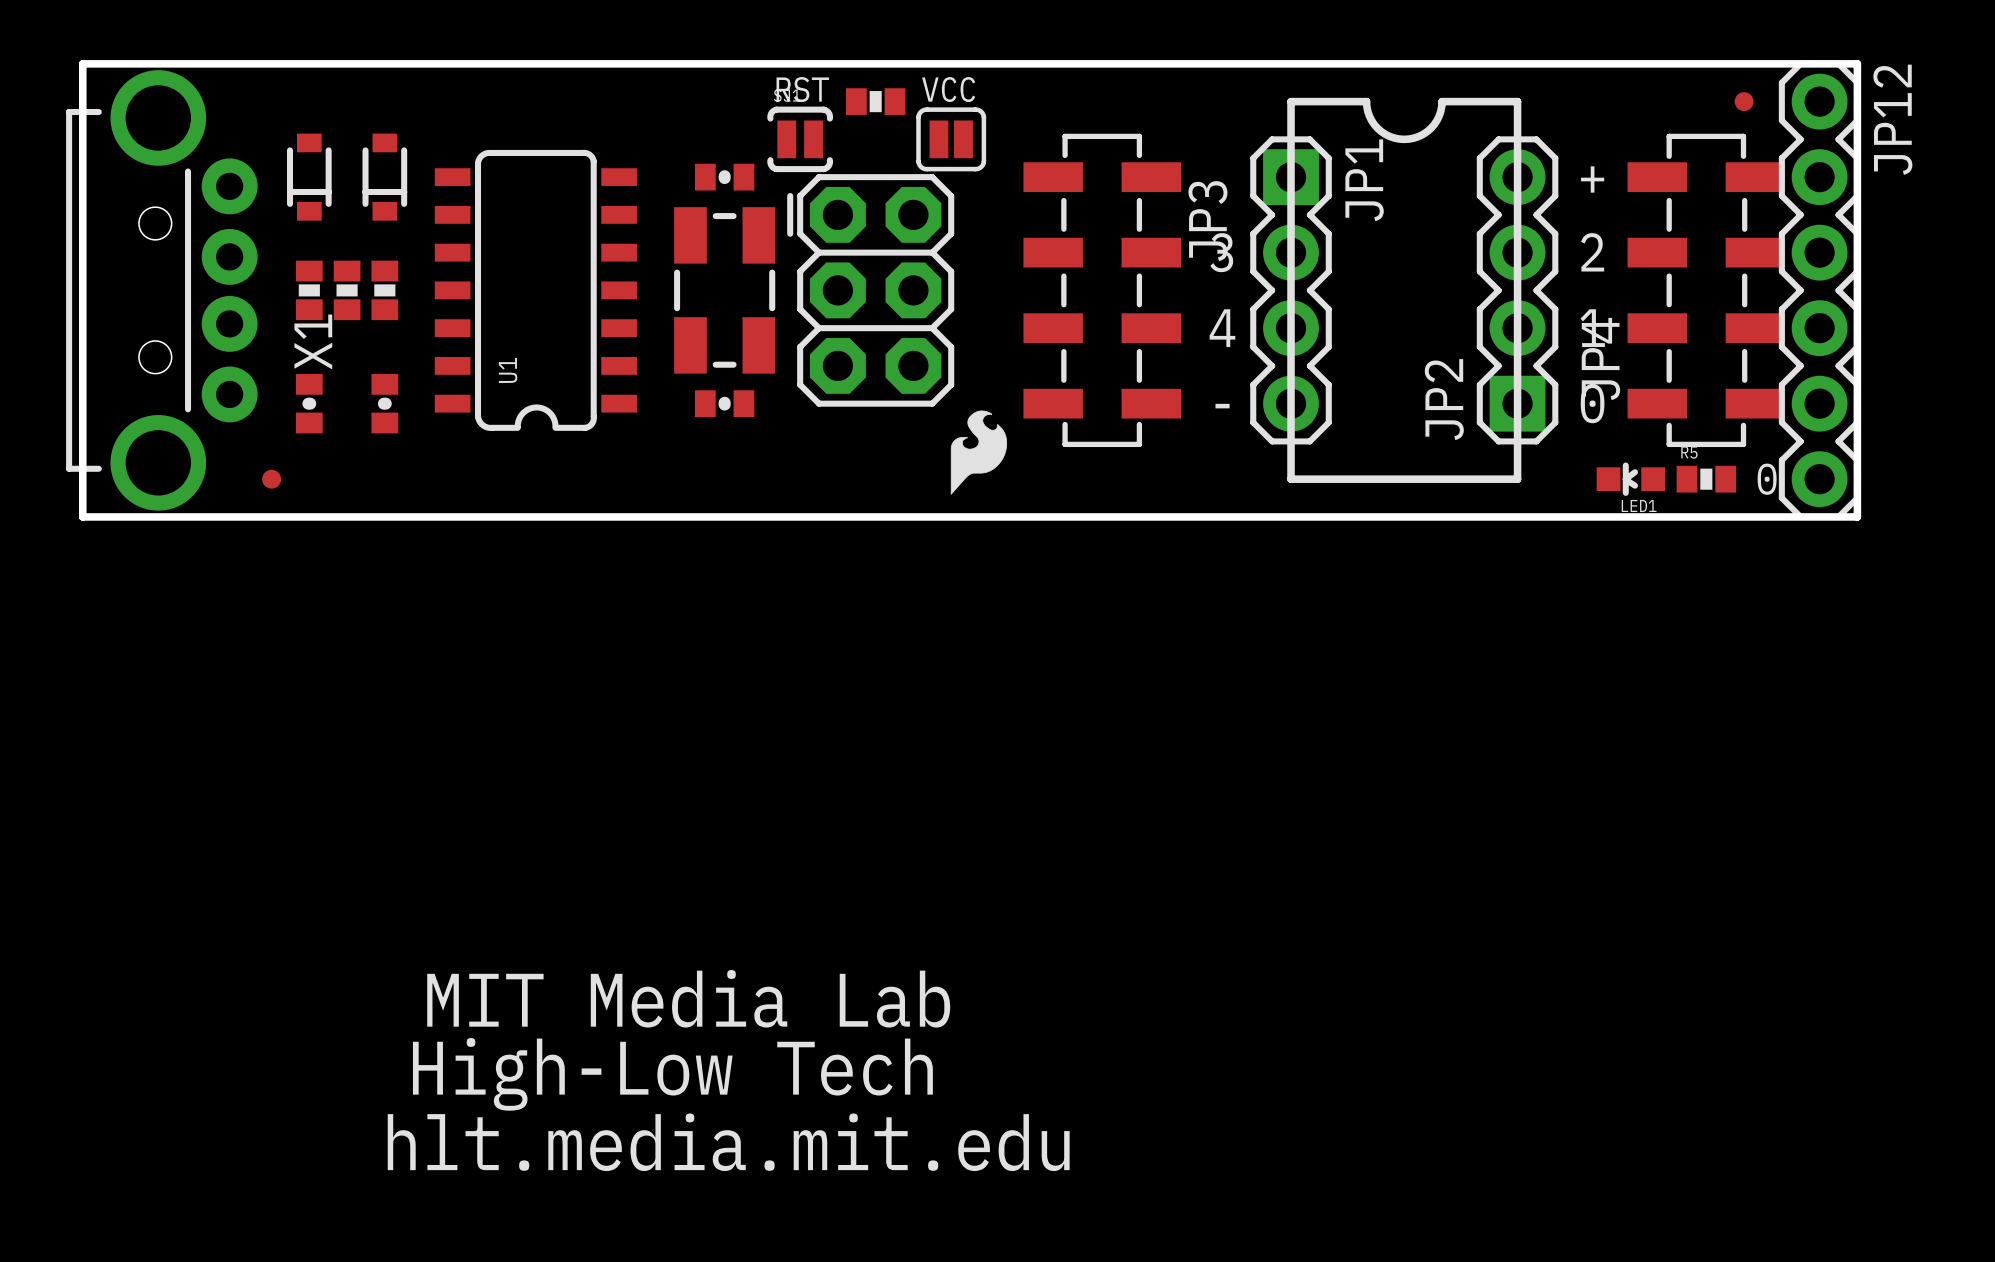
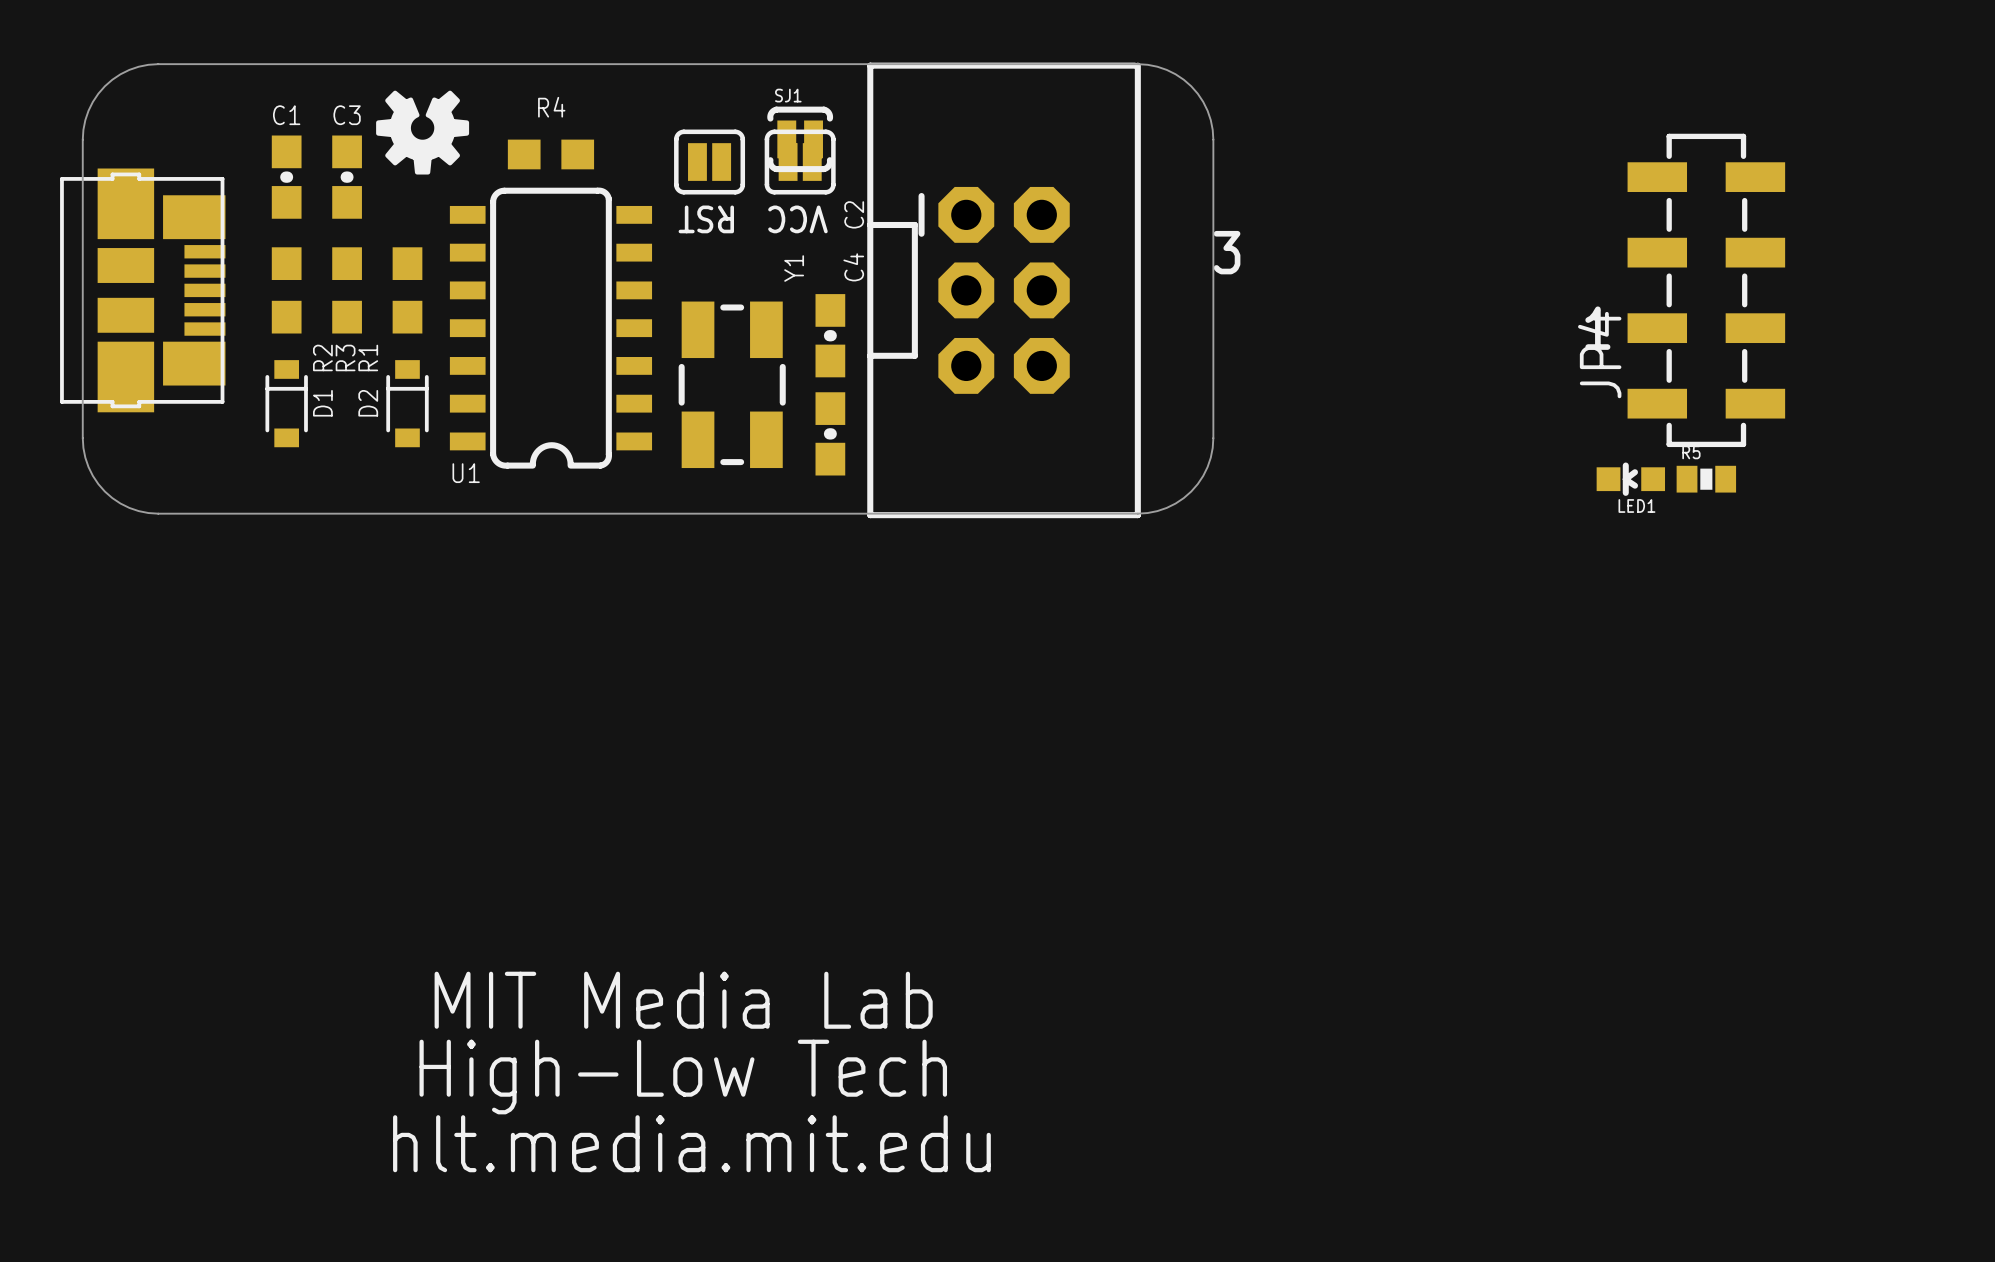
text rotation: 0° (802, 89) -> 180° (706, 219)
text position: RST (802, 89) -> RST (706, 219)
text rotation: 0° (948, 89) -> 180° (797, 219)
text position: VCC (948, 89) -> VCC (797, 219)
drawing: none -> [376, 90, 470, 175]
part: (875, 101) -> none
line: (1291, 101) (1366, 101) (1369, 116) (1377, 128) (1389, 136) (1404, 139) (1418, 136) (1430, 128) (1439, 116) (1442, 101) (1517, 101) (1517, 479) (1291, 479) (1291, 101) -> none
part: (1744, 101) -> none
board edge: (82, 139) (82, 63) (1857, 63) (1857, 516) (82, 516) (82, 438) -> (82, 139) (88, 110) (104, 86) (129, 69) (158, 64) (1147, 64) (1166, 69) (1191, 86) (1207, 110) (1213, 139) (1212, 448) (1207, 467) (1191, 491) (1175, 503) (1157, 511) (1137, 513) (148, 513) (129, 507) (104, 491) (88, 467) (82, 438)
board edge width: thick (82, 139) (82, 438) -> thin (82, 139) (82, 438)
part: (951, 139) -> none
R4: none -> (550, 154)
part: none -> (800, 162)
part footprint: [694, 163, 755, 191] -> [674, 129, 746, 195]
C1: none -> (286, 177)
part: (309, 177) -> none
C3: none -> (347, 177)
part: (384, 177) -> none
text: + (1592, 179) -> none
text: 2 (1592, 252) -> none
part: none -> (142, 290)
X1: (161, 290) -> none
R2: none -> (286, 290)
part: (309, 290) -> none
part: (347, 290) -> none
R3: none -> (347, 290)
part: (384, 290) -> none
R1: none -> (407, 290)
U1 position: (535, 290) -> (550, 328)
part: (724, 290) -> none
part: (870, 290) -> none
part: none -> (1004, 290)
JP3: (1102, 290) -> none
JP1: (1291, 290) -> none
JP2: (1517, 290) -> none
JP12: (1819, 290) -> none
text: 4 (1222, 328) -> none
C2: none -> (830, 335)
U1 name rotation: 0° (508, 370) -> 90° clockwise (466, 473)
U1 name position: U1 (508, 370) -> U1 (466, 473)
Y1: none -> (732, 384)
D1: none -> (286, 403)
part: (309, 403) -> none
part: (384, 403) -> none
D2: none -> (407, 403)
part: (724, 403) -> none
text: 0 (1592, 403) -> none
text: - (1222, 406) -> none
drawing: [950, 410, 1008, 495] -> none
C4: none -> (830, 433)
part: (271, 479) -> none
text: 0 (1767, 479) -> none

